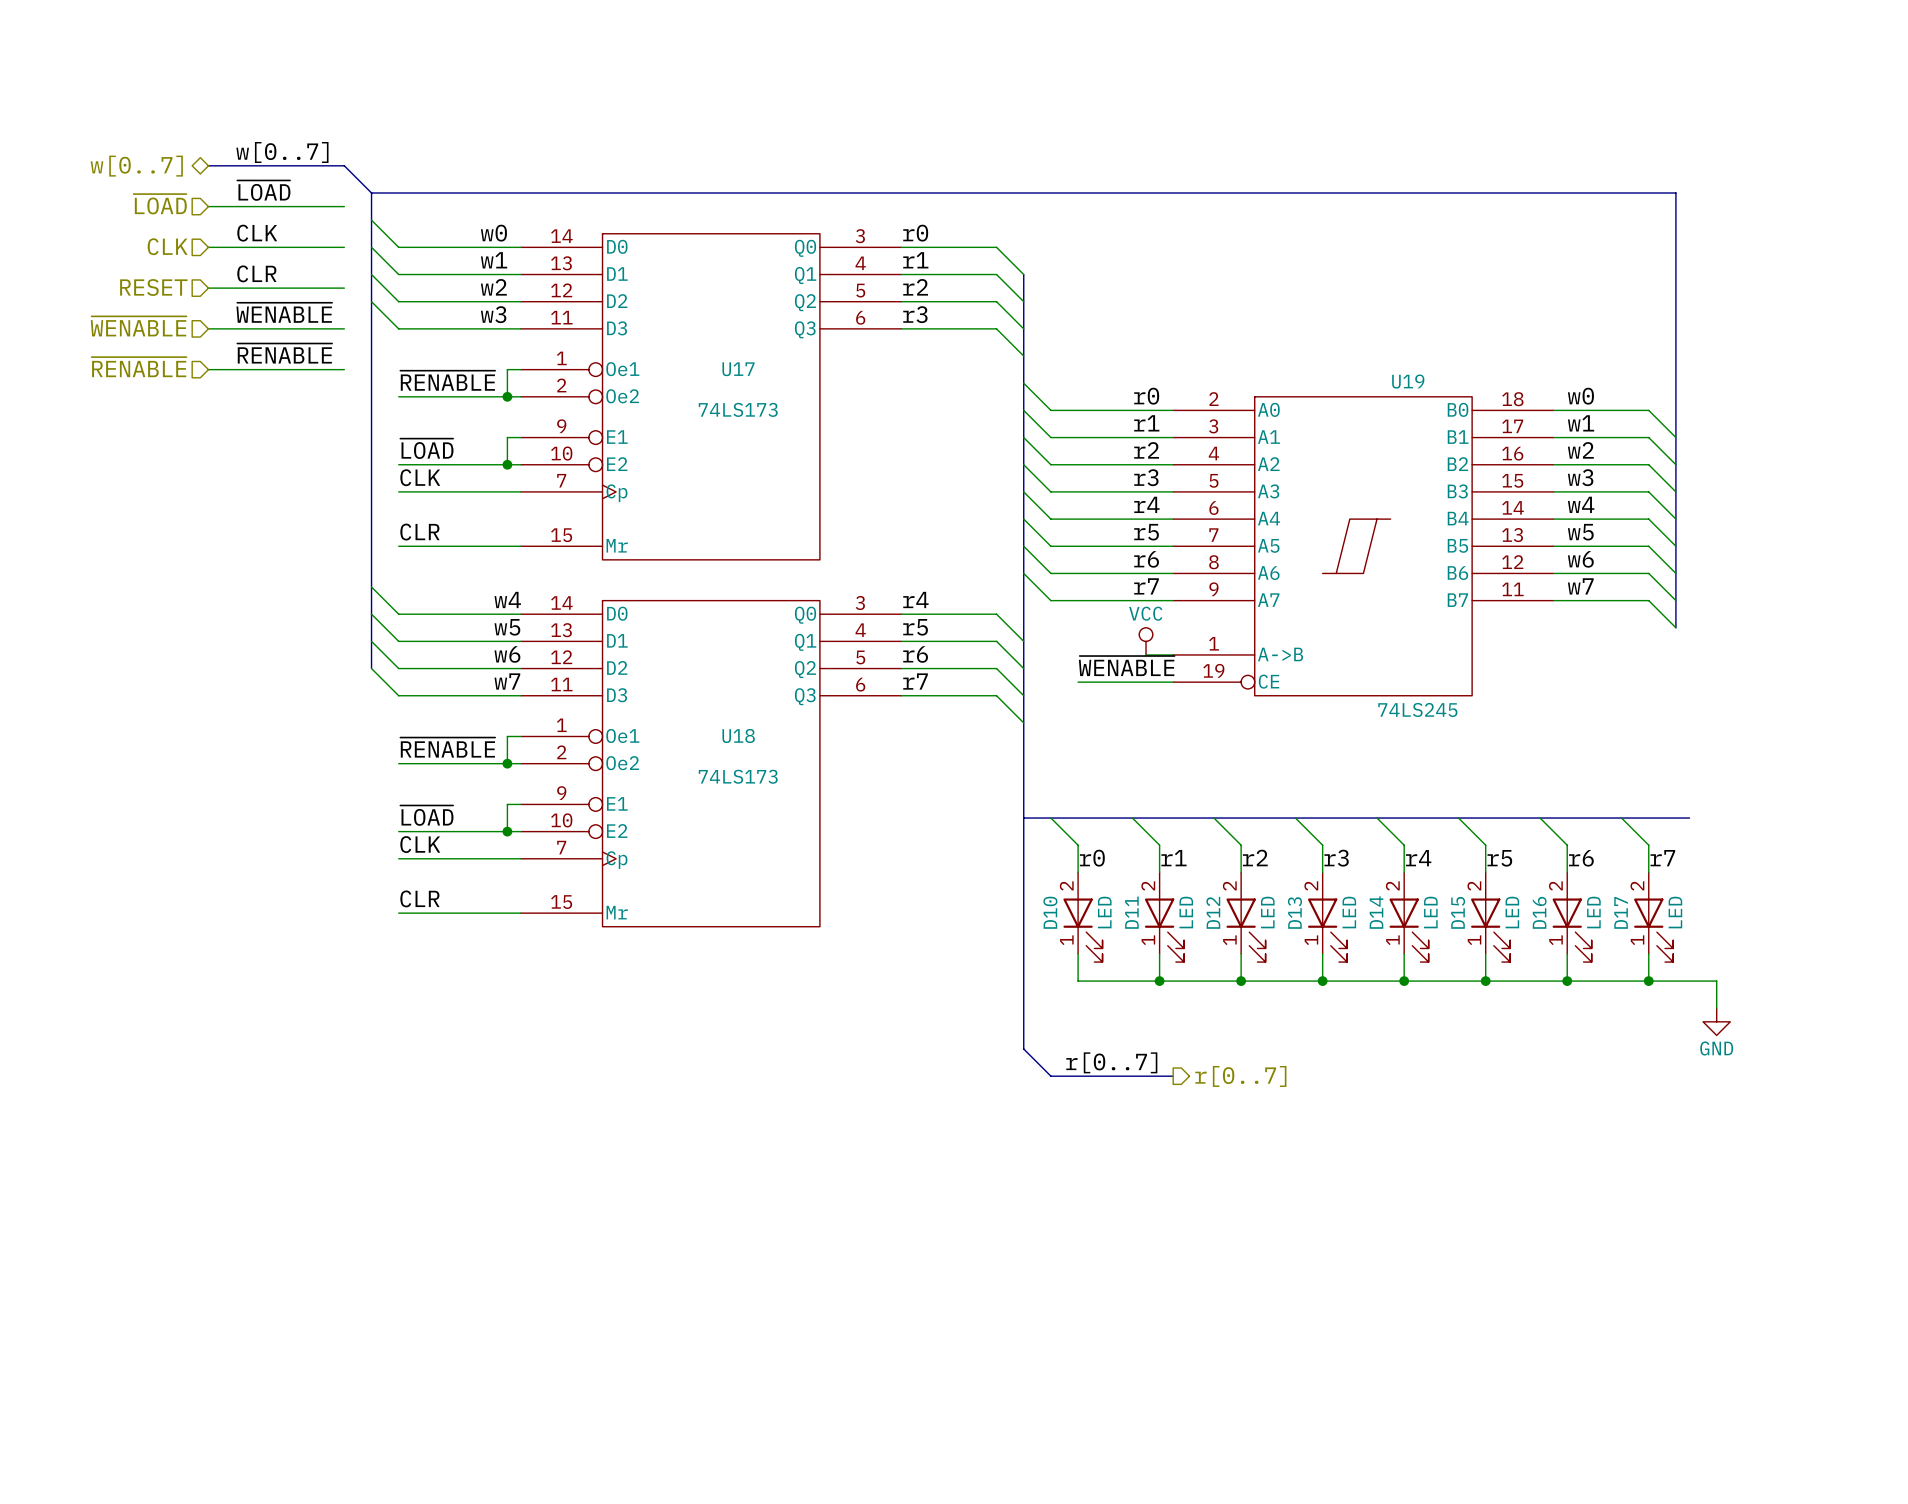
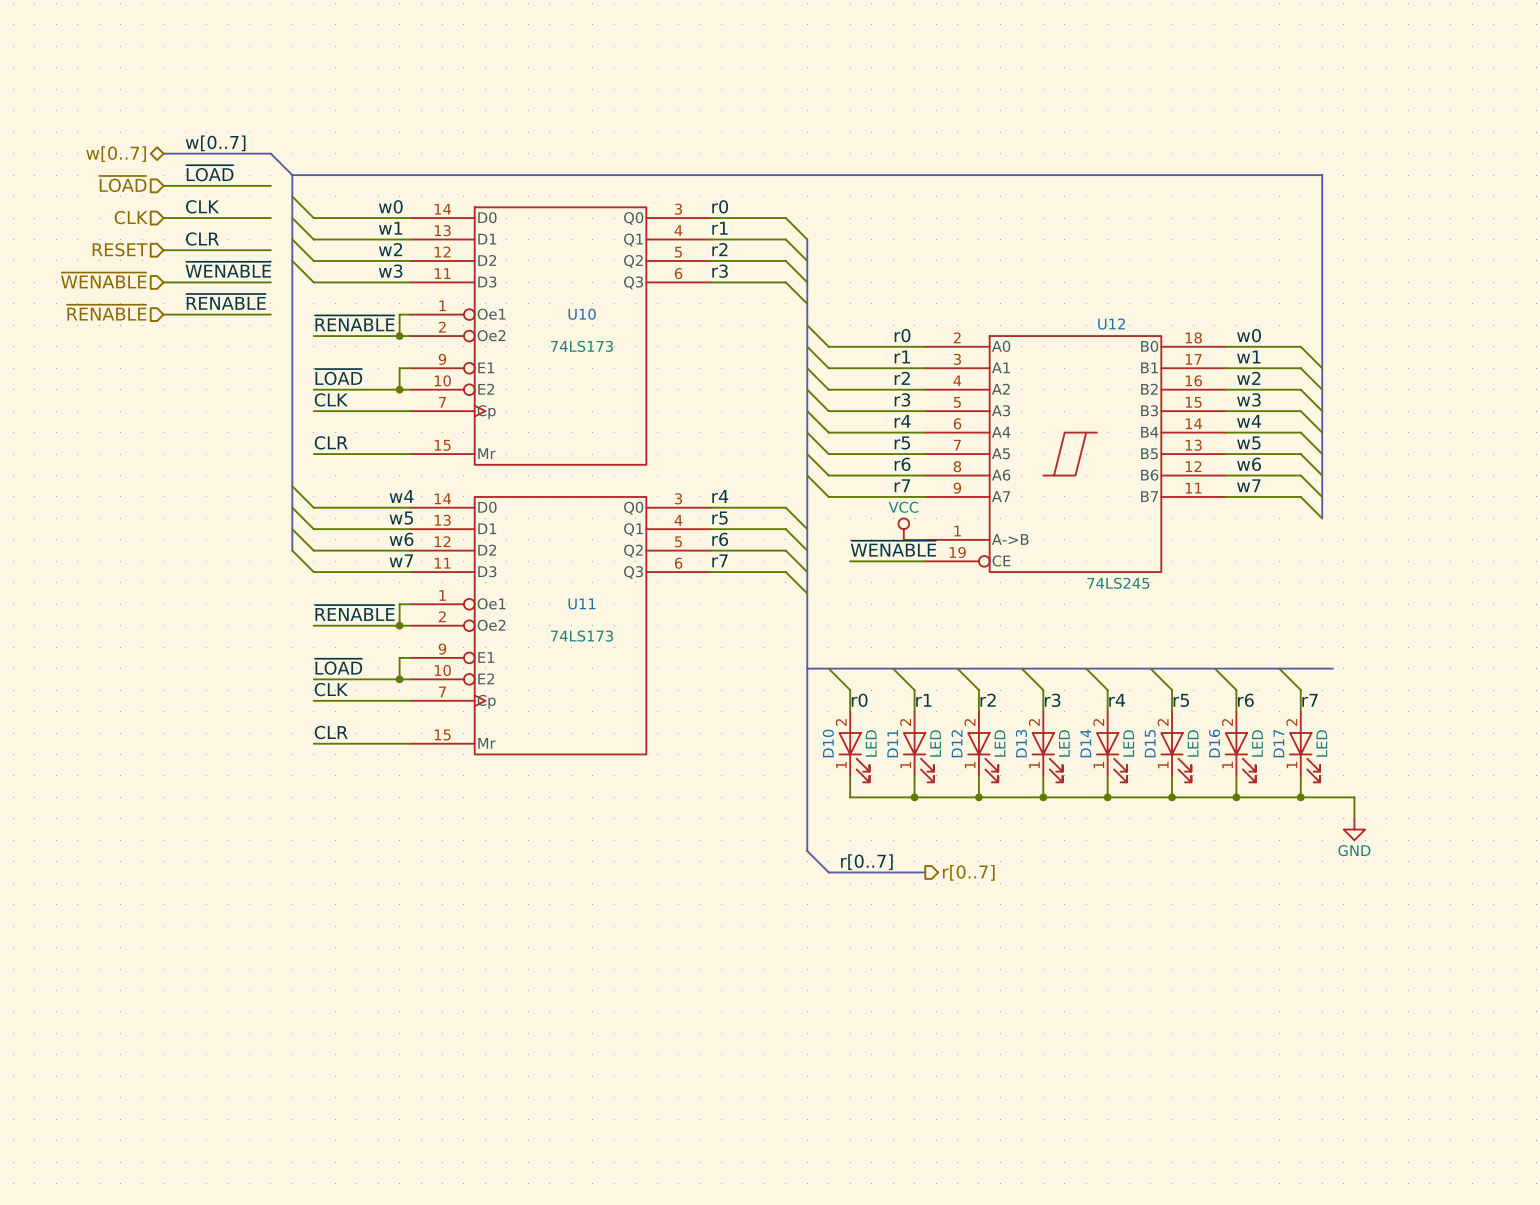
U17 name: U17 (738, 369) -> U10 (582, 314)
U19 name: U19 (1408, 381) -> U12 (1111, 324)
U18 name: U18 (738, 735) -> U11 (581, 603)

